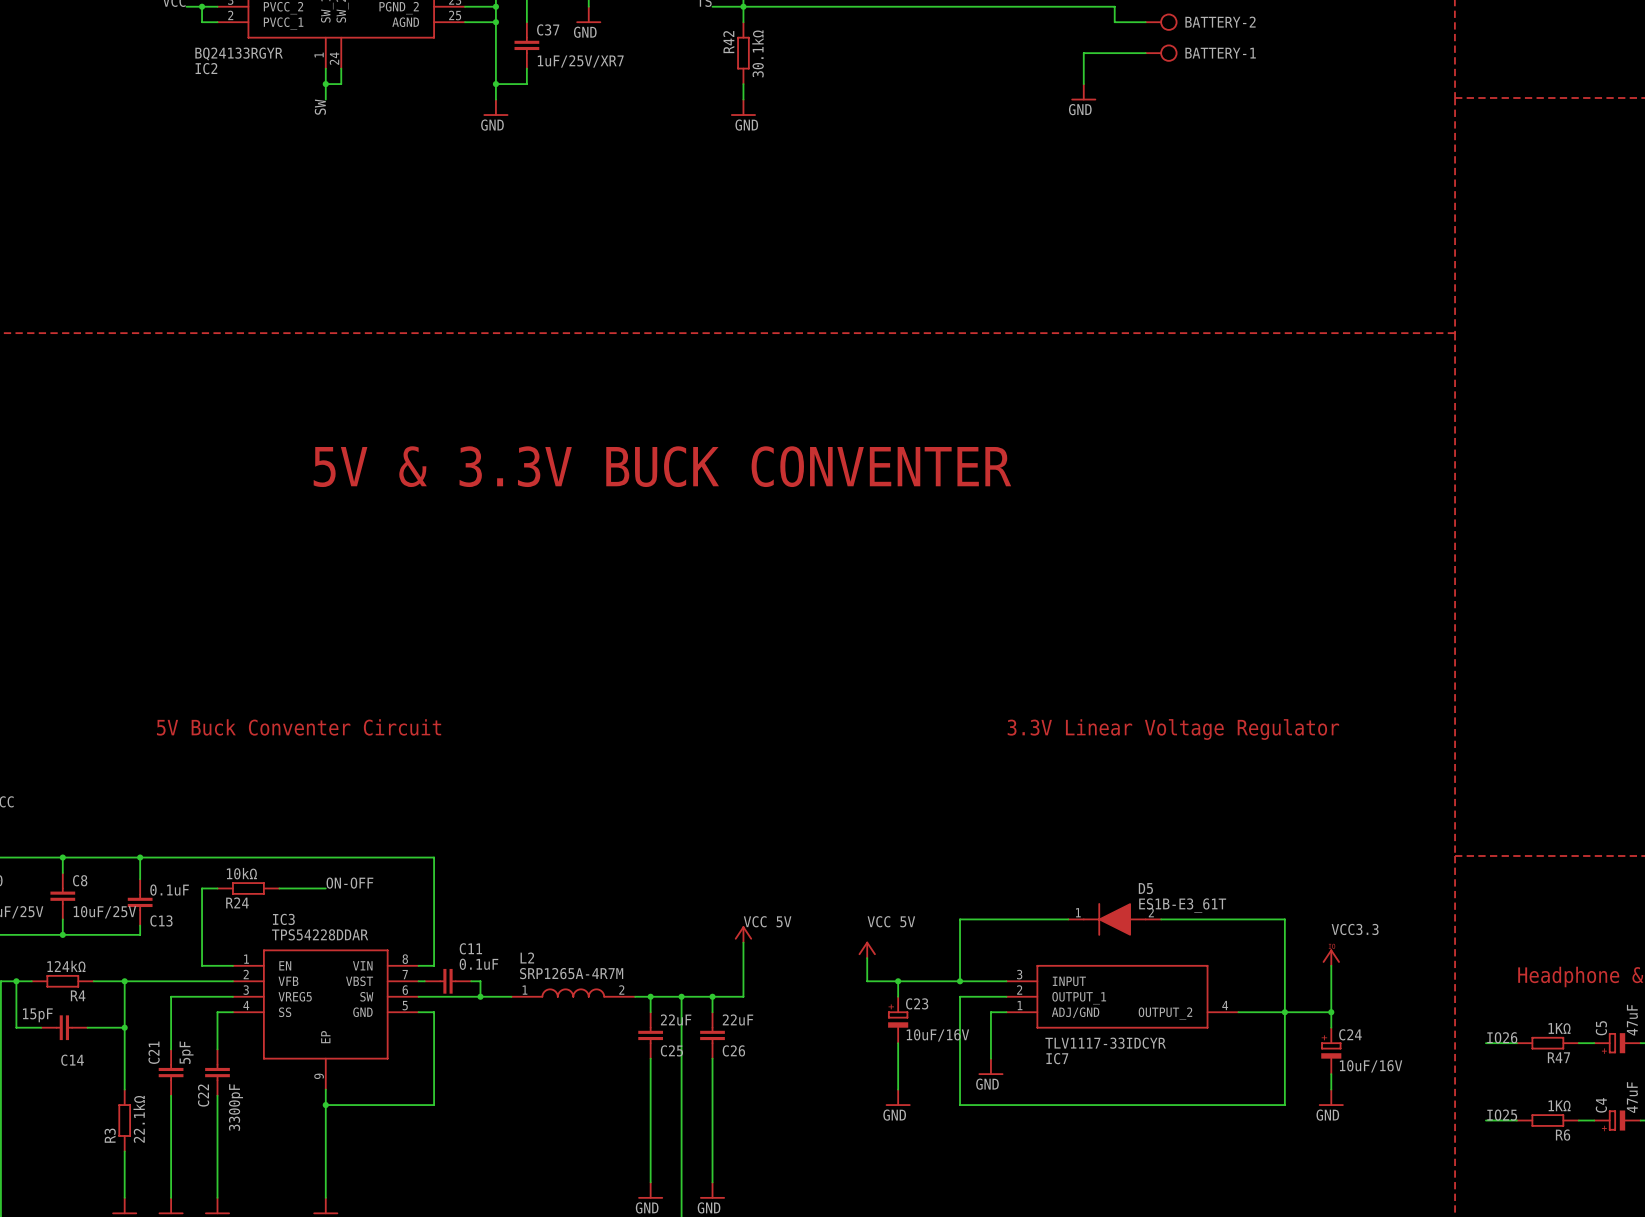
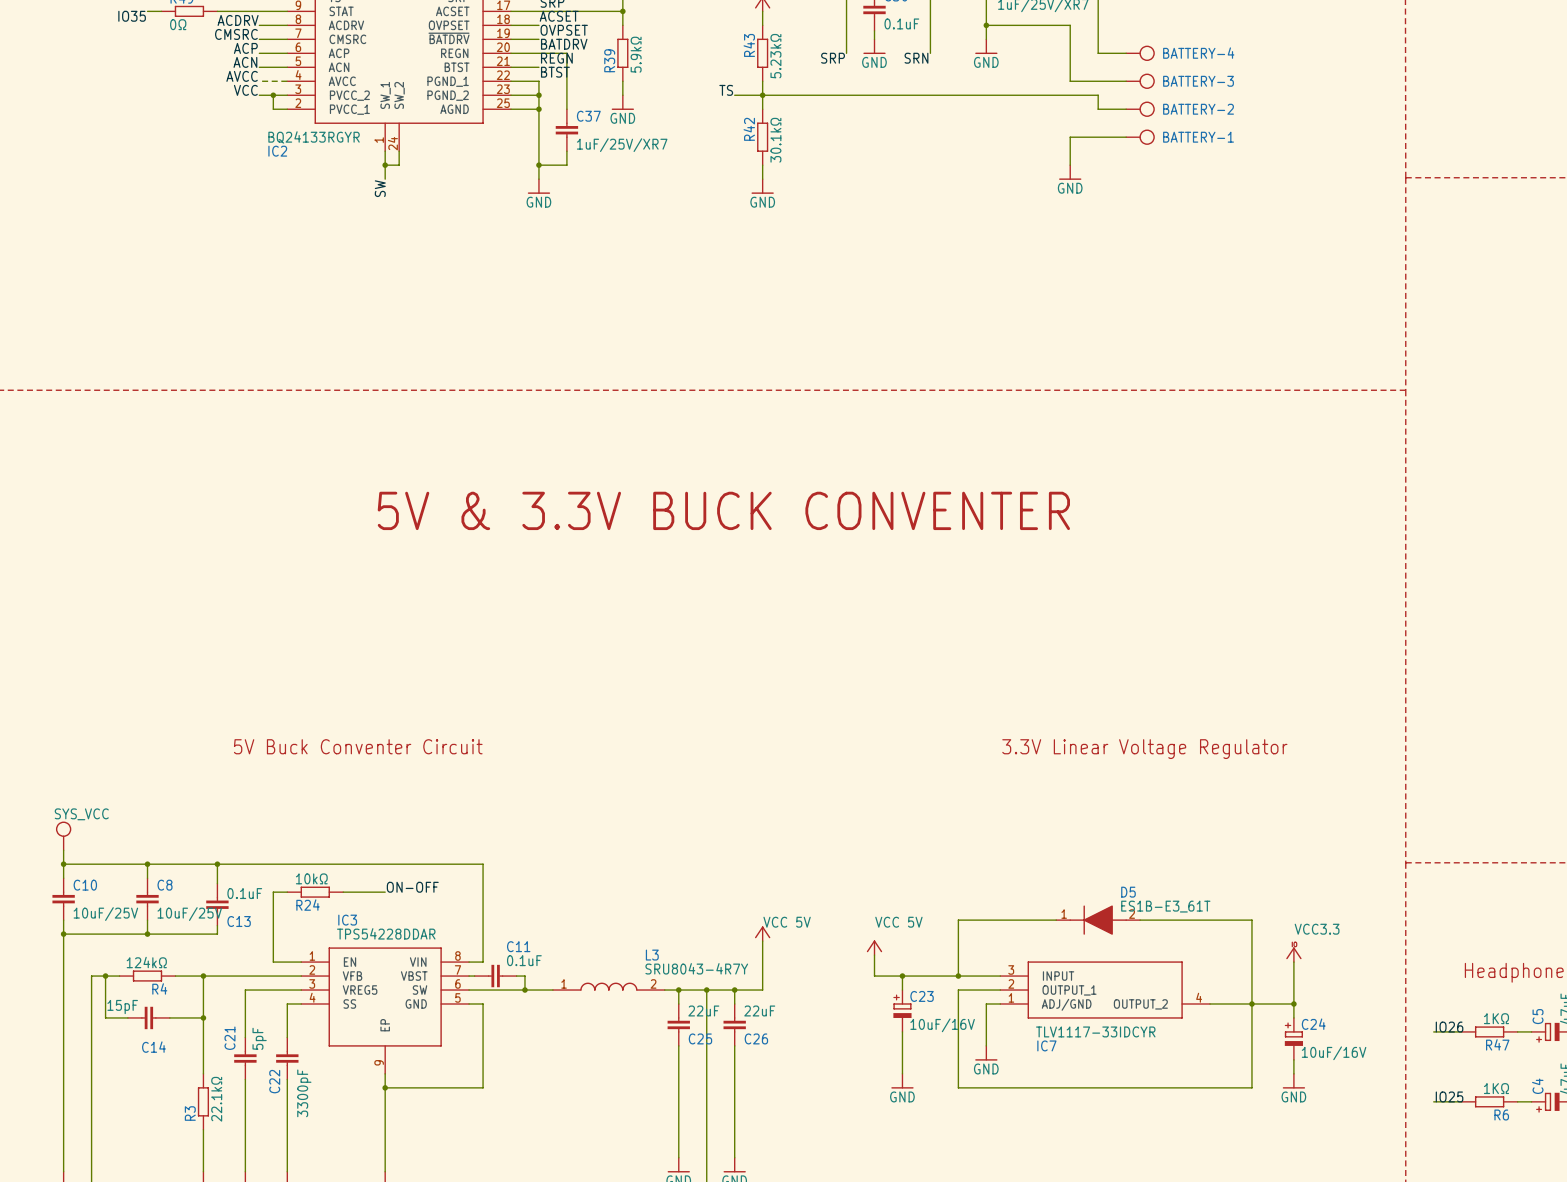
L2 name: L2 (527, 957) -> L3 (652, 955)
L2 value: SRP1265A-4R7M (571, 973) -> SRU8043-4R7Y (696, 968)

